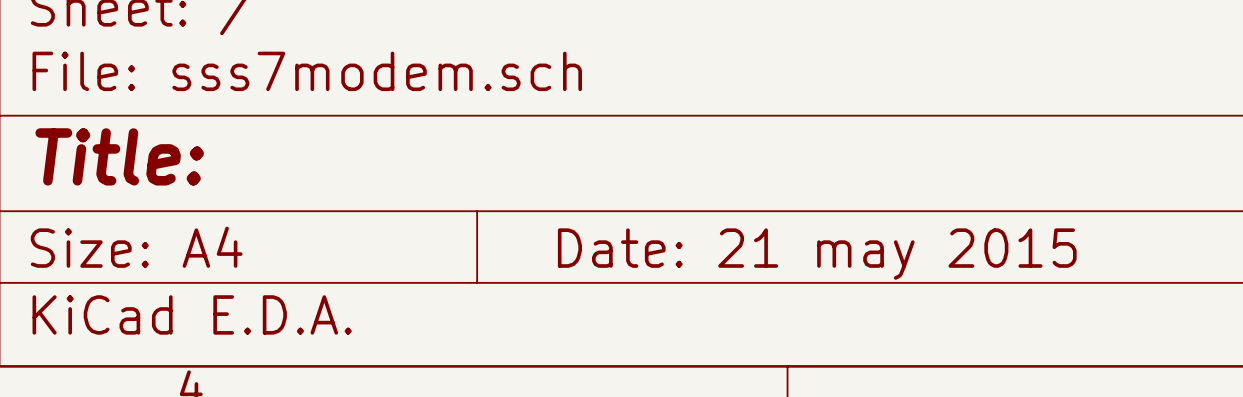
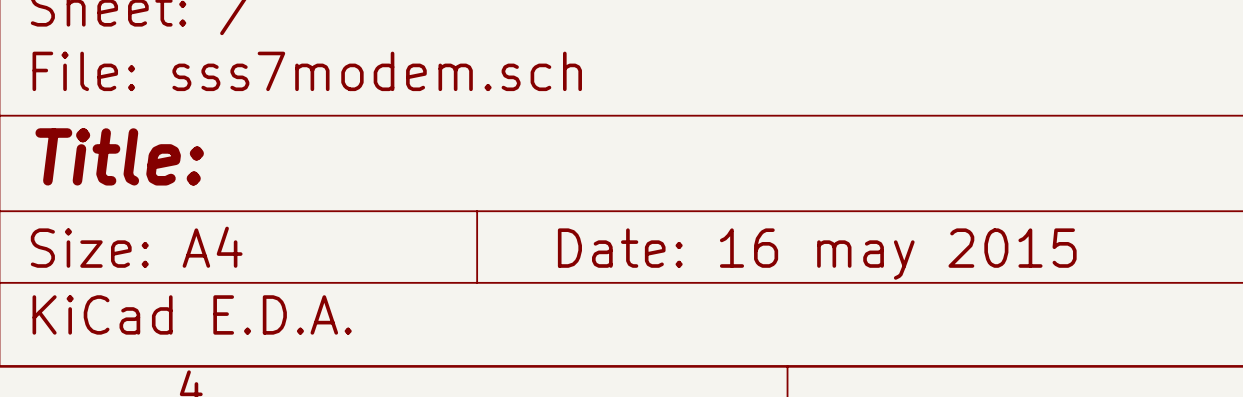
title block: Date: 21 may 2015 (817, 254) -> Date: 16 may 2015 (817, 254)

